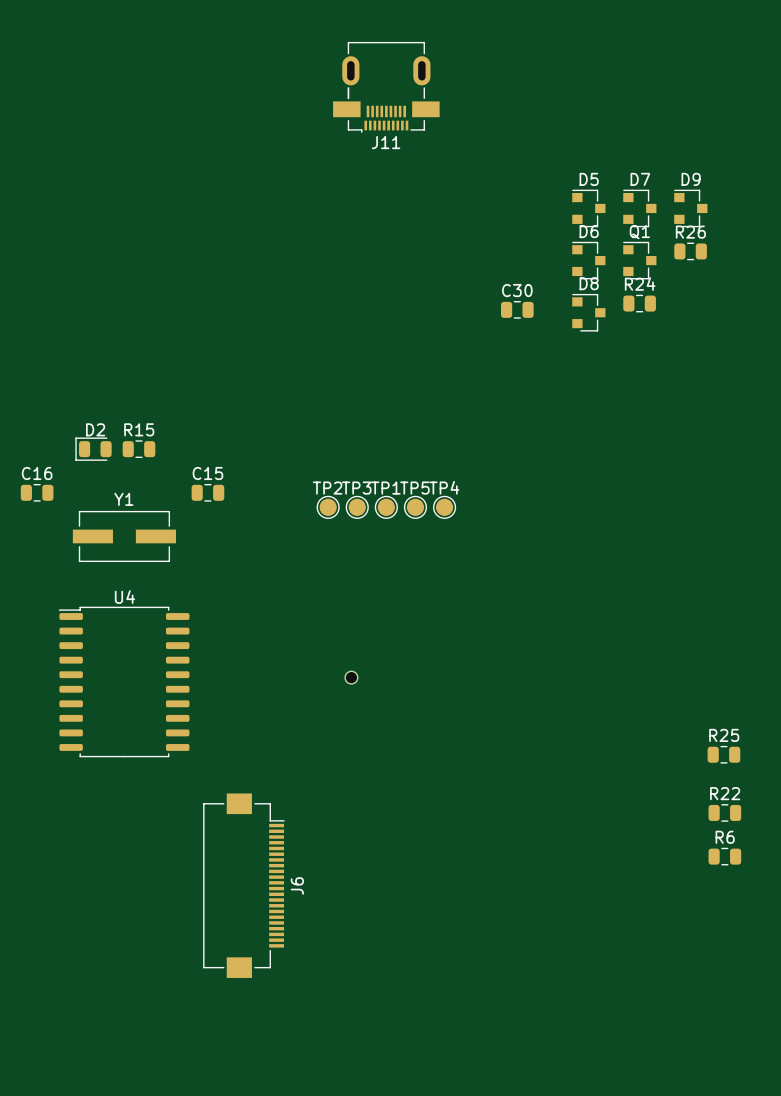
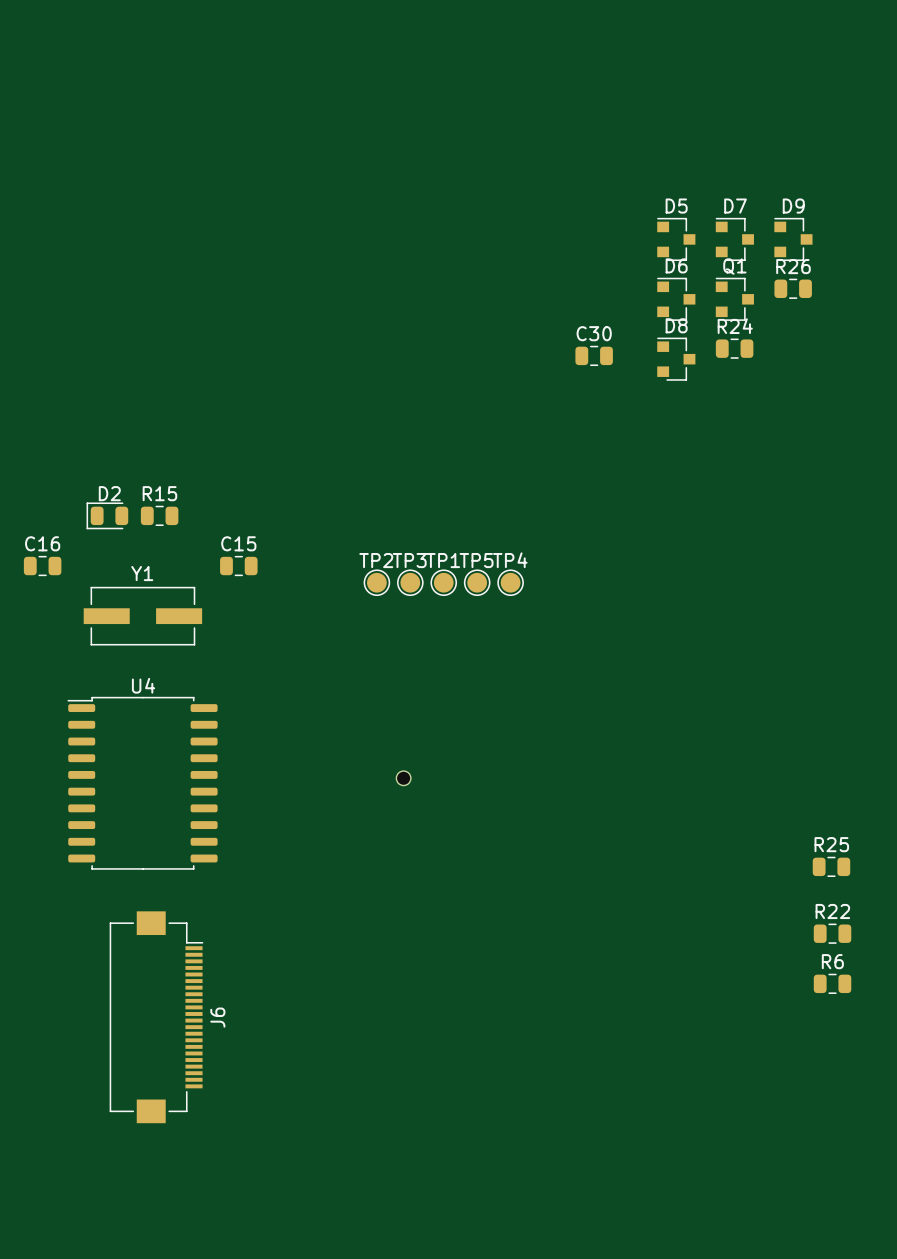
J11: (386, 87) -> none
J6 position: (243, 885) -> (156, 1017)

